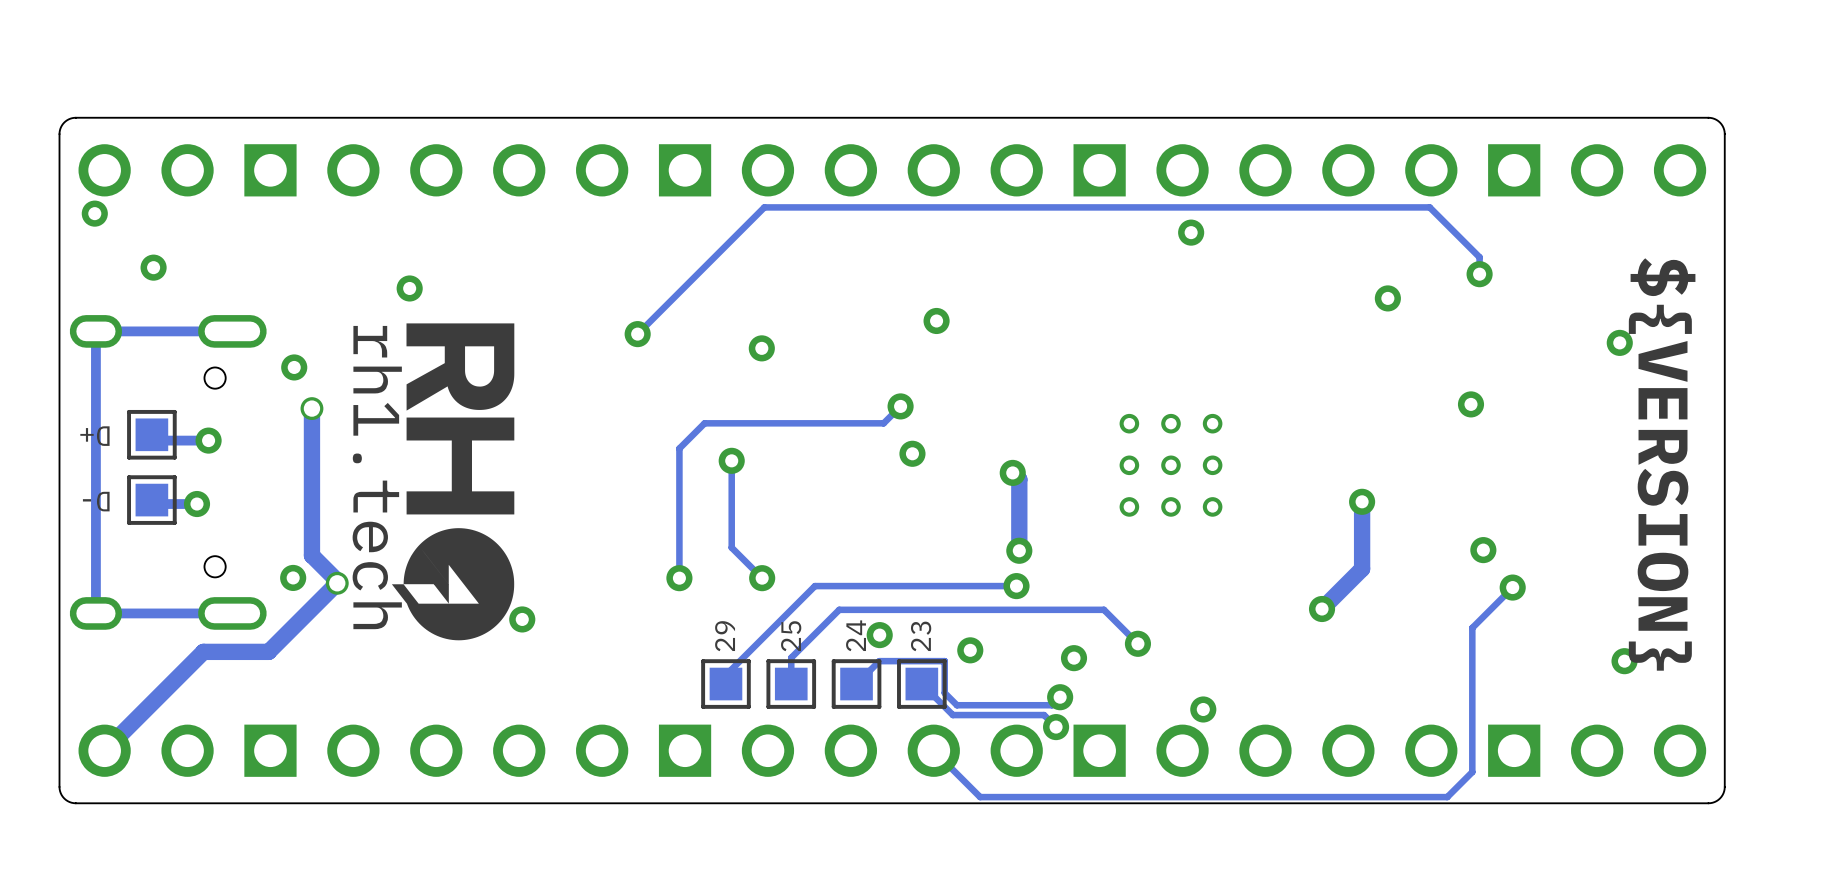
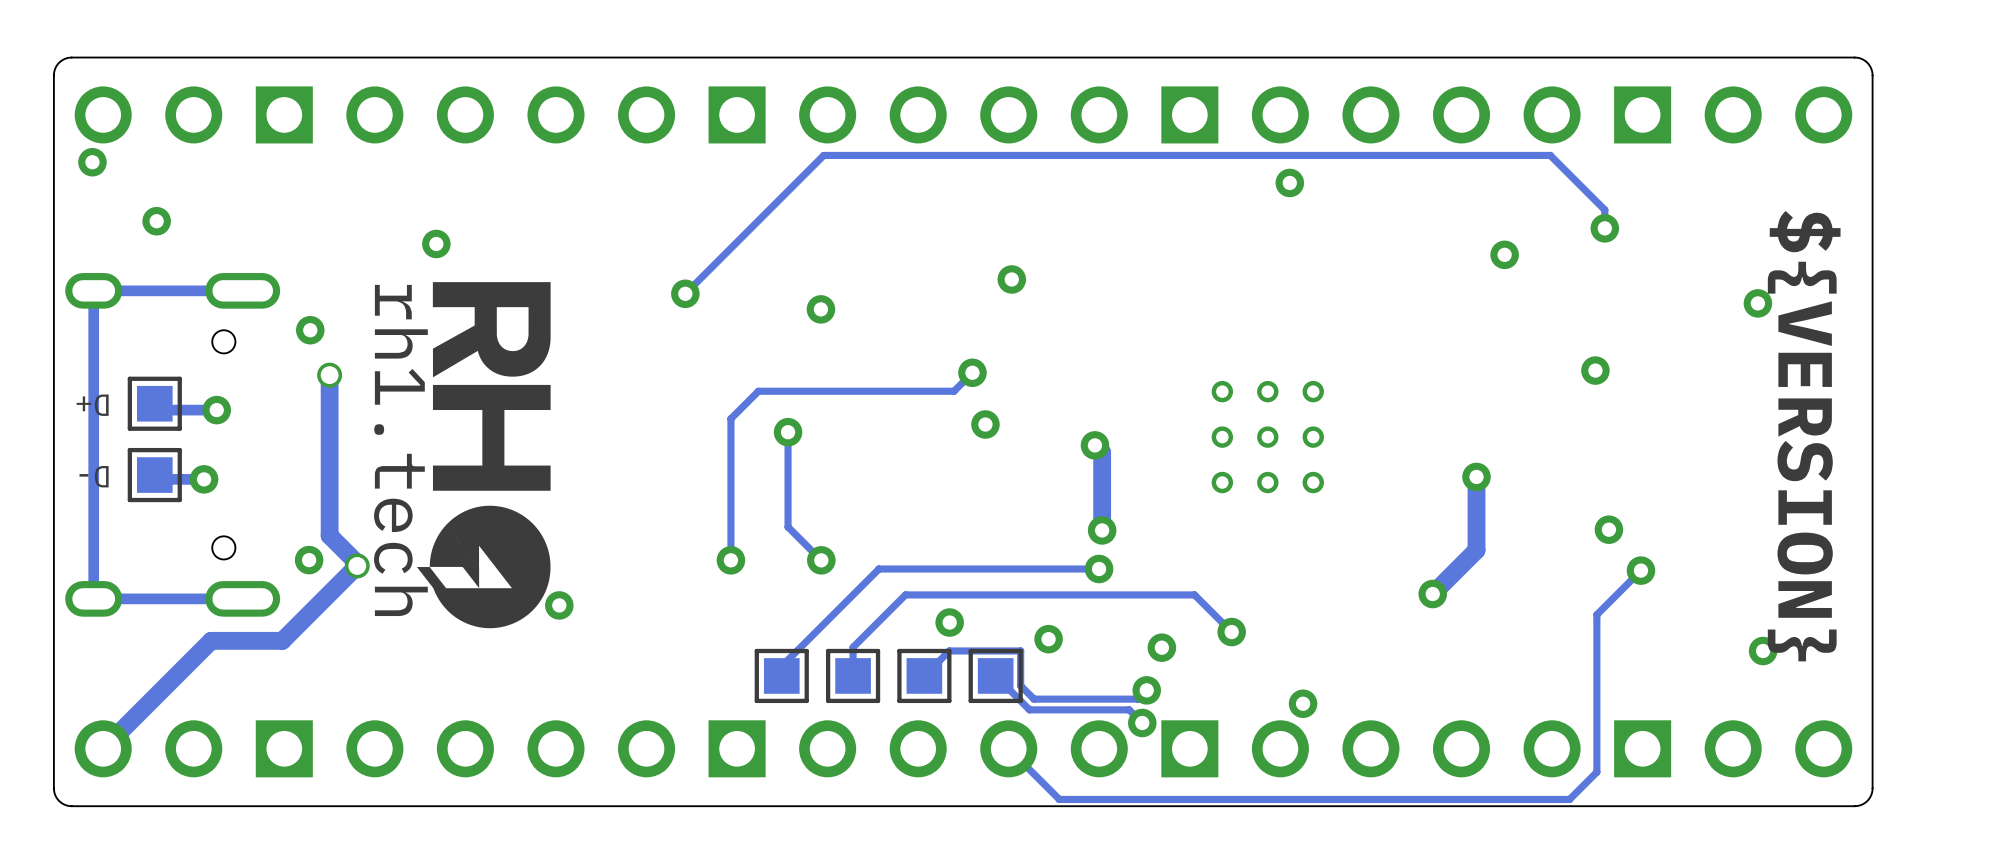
text: 24 (856, 635) -> none
text: 29 (725, 636) -> none
text: 25 (791, 636) -> none
text: 23 (921, 636) -> none

